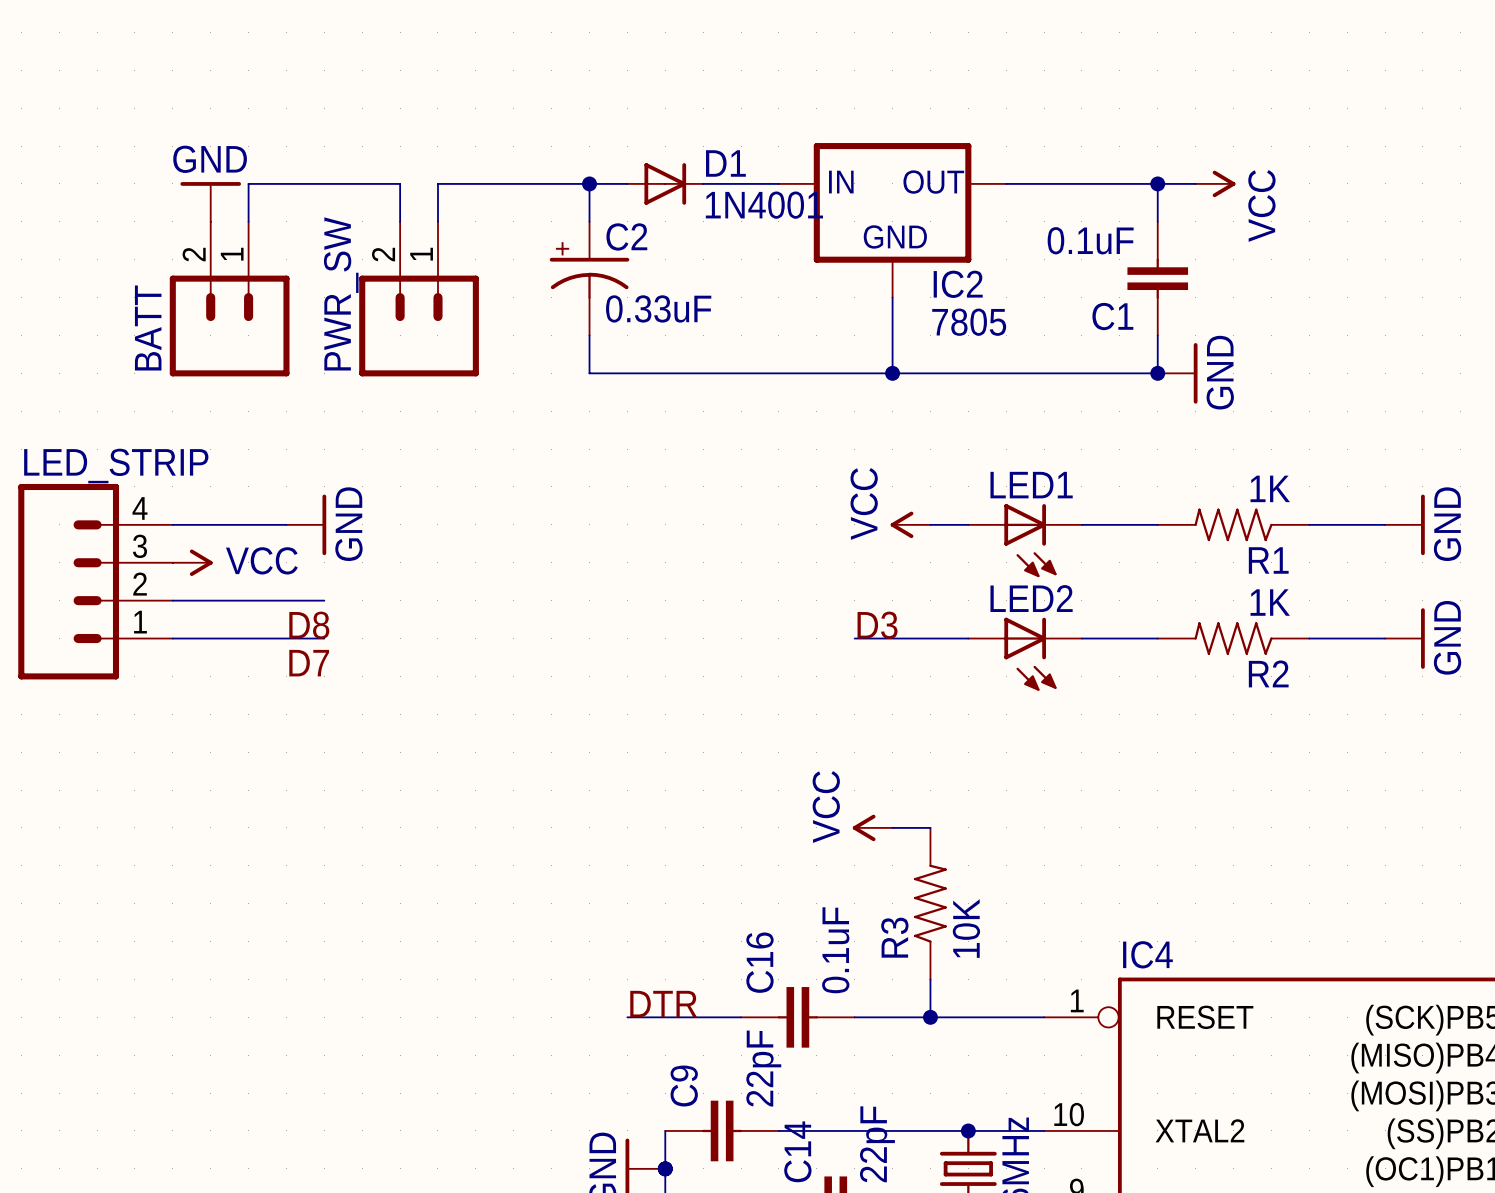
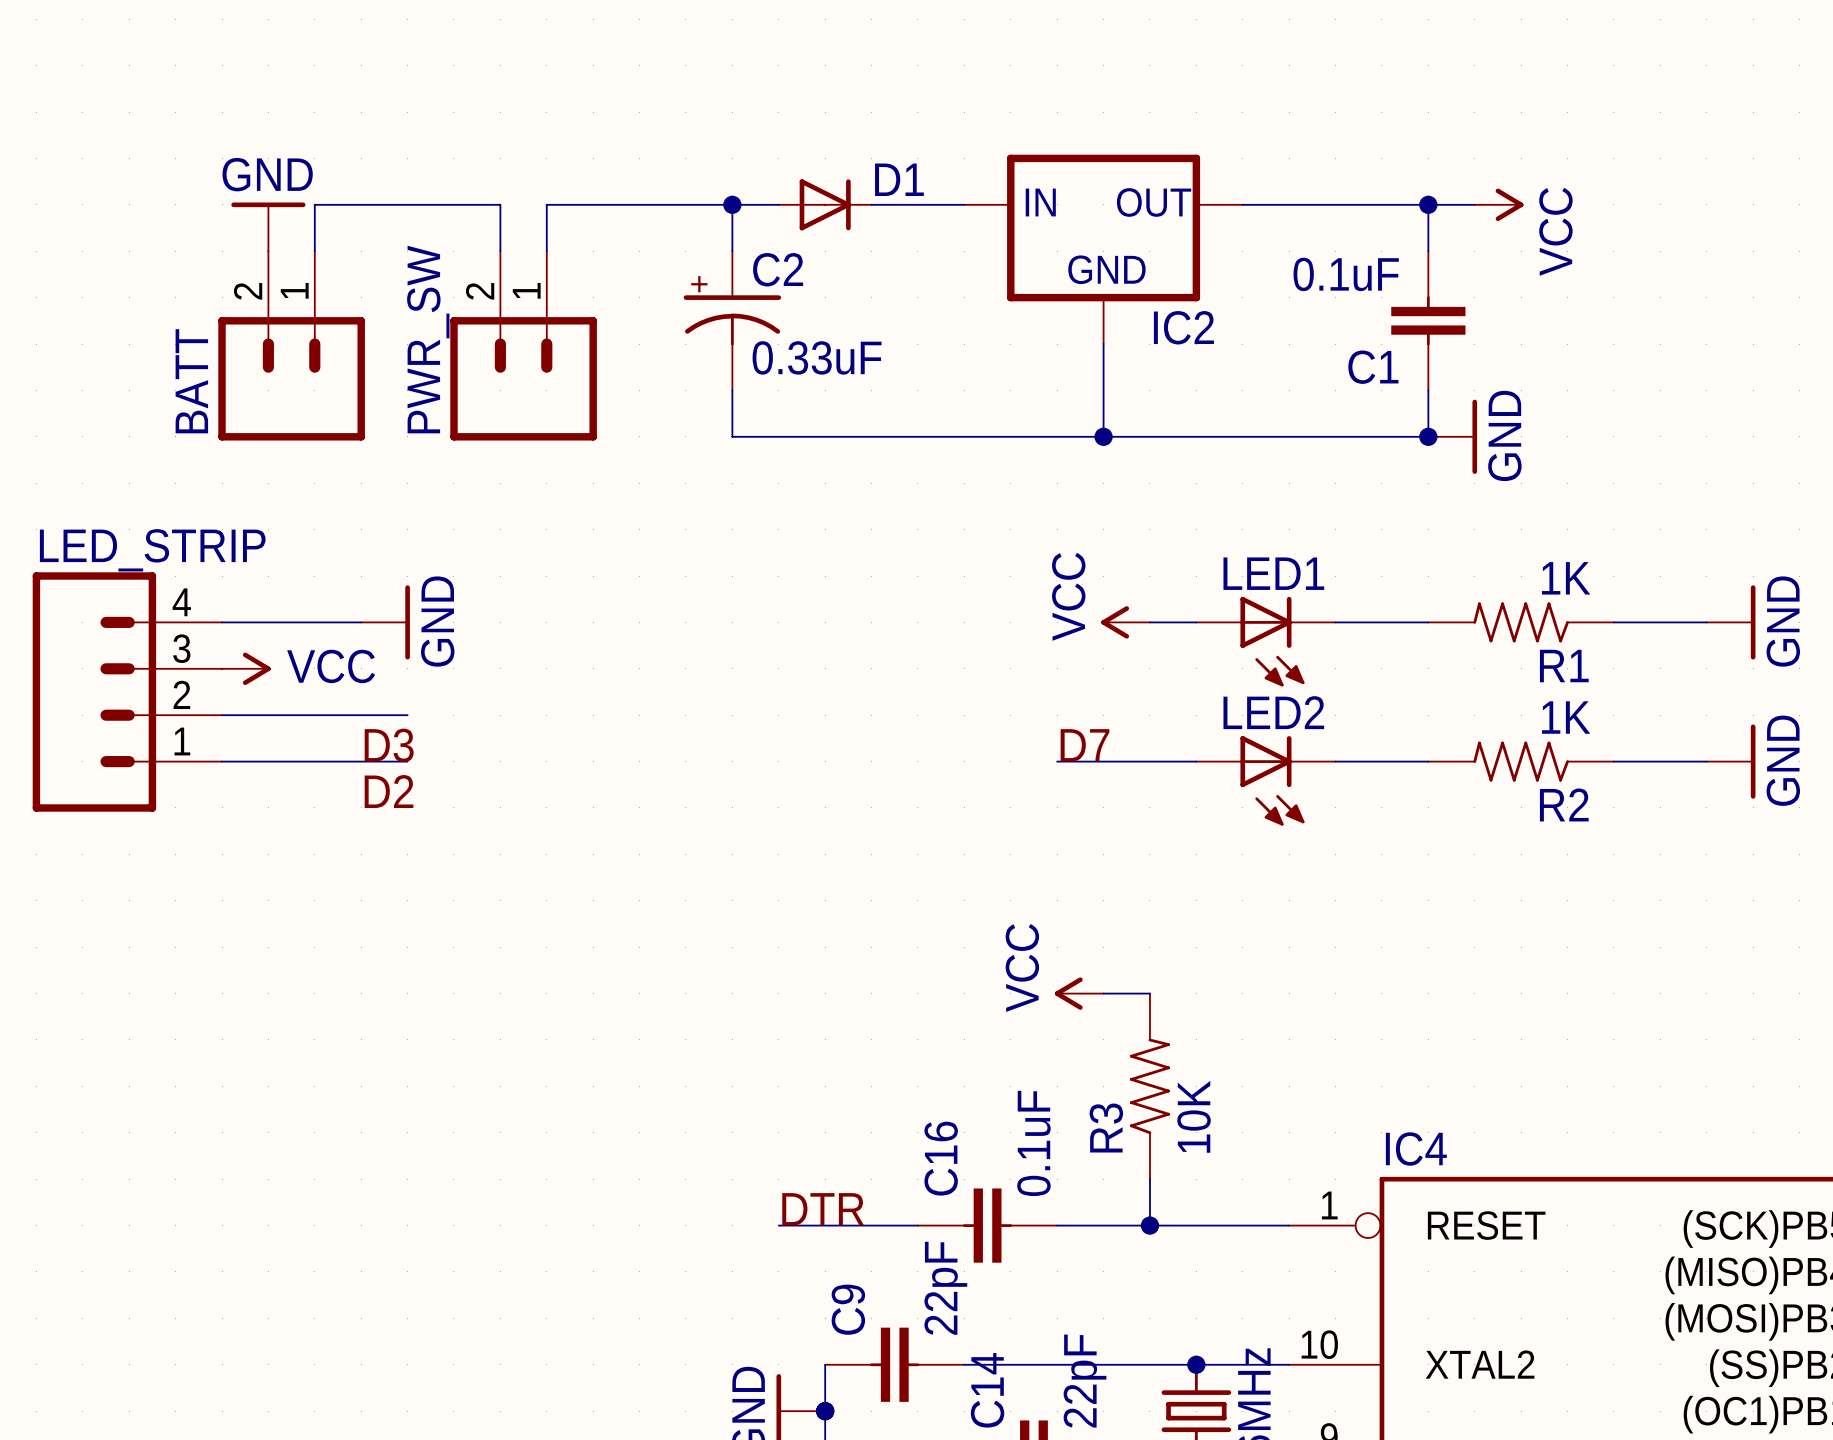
D1 value: 1N4001 (764, 205) -> none
IC2 value: 7805 (969, 322) -> none
label: D8 (309, 625) -> D3 (389, 745)
label: D3 (877, 625) -> D7 (1085, 745)
label: D7 (309, 663) -> D2 (389, 791)

